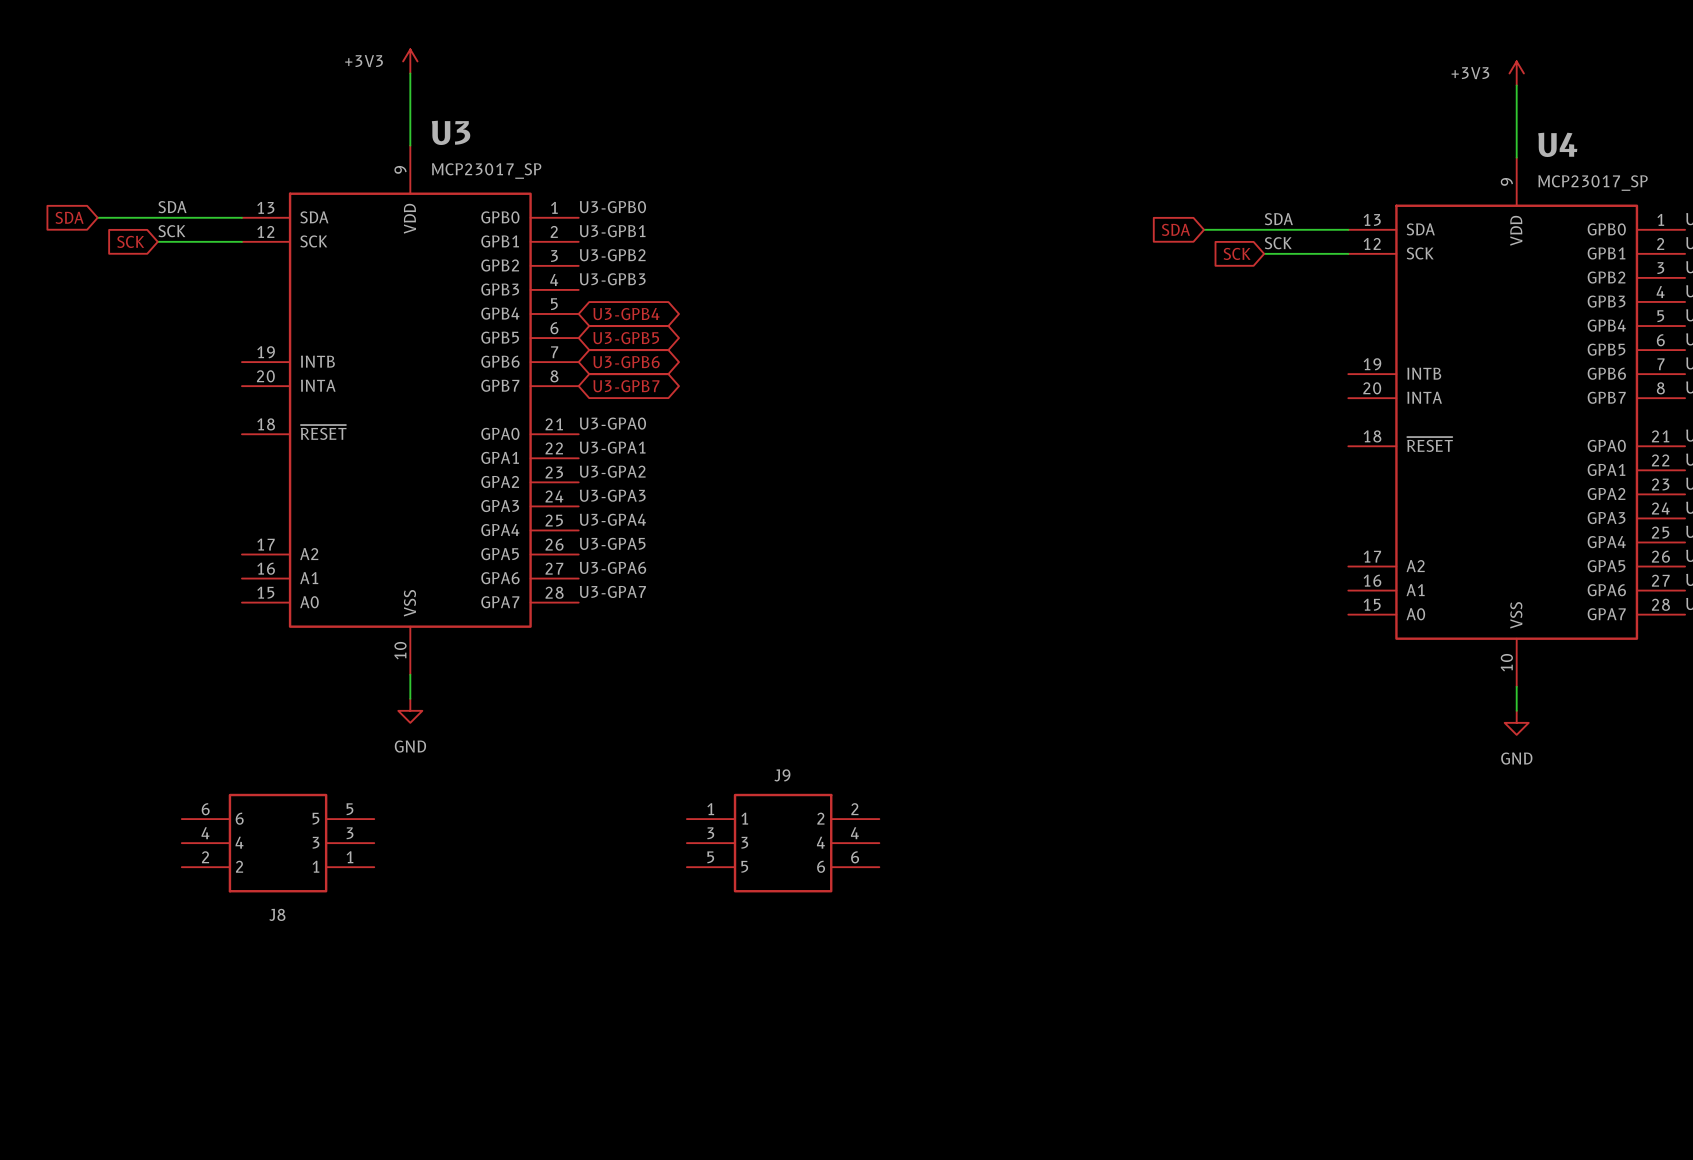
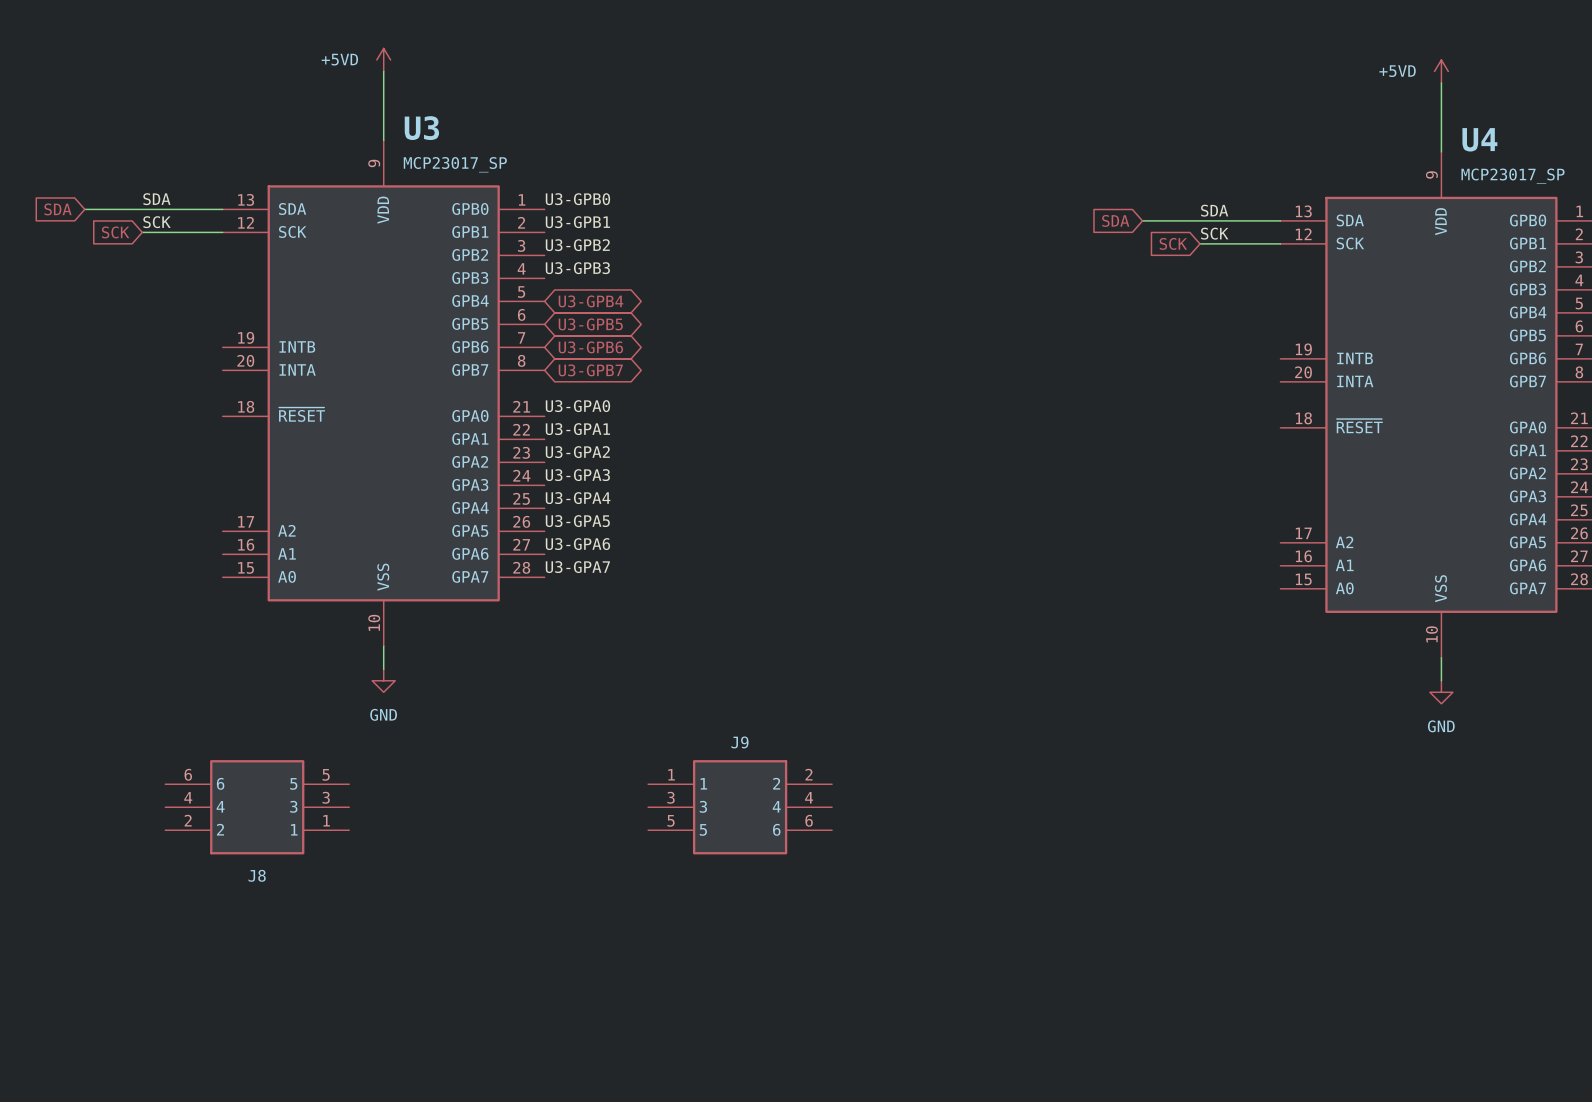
power symbol: +3V3 (410, 61) -> +5VD (383, 59)
power symbol: +3V3 (1516, 73) -> +5VD (1441, 71)

